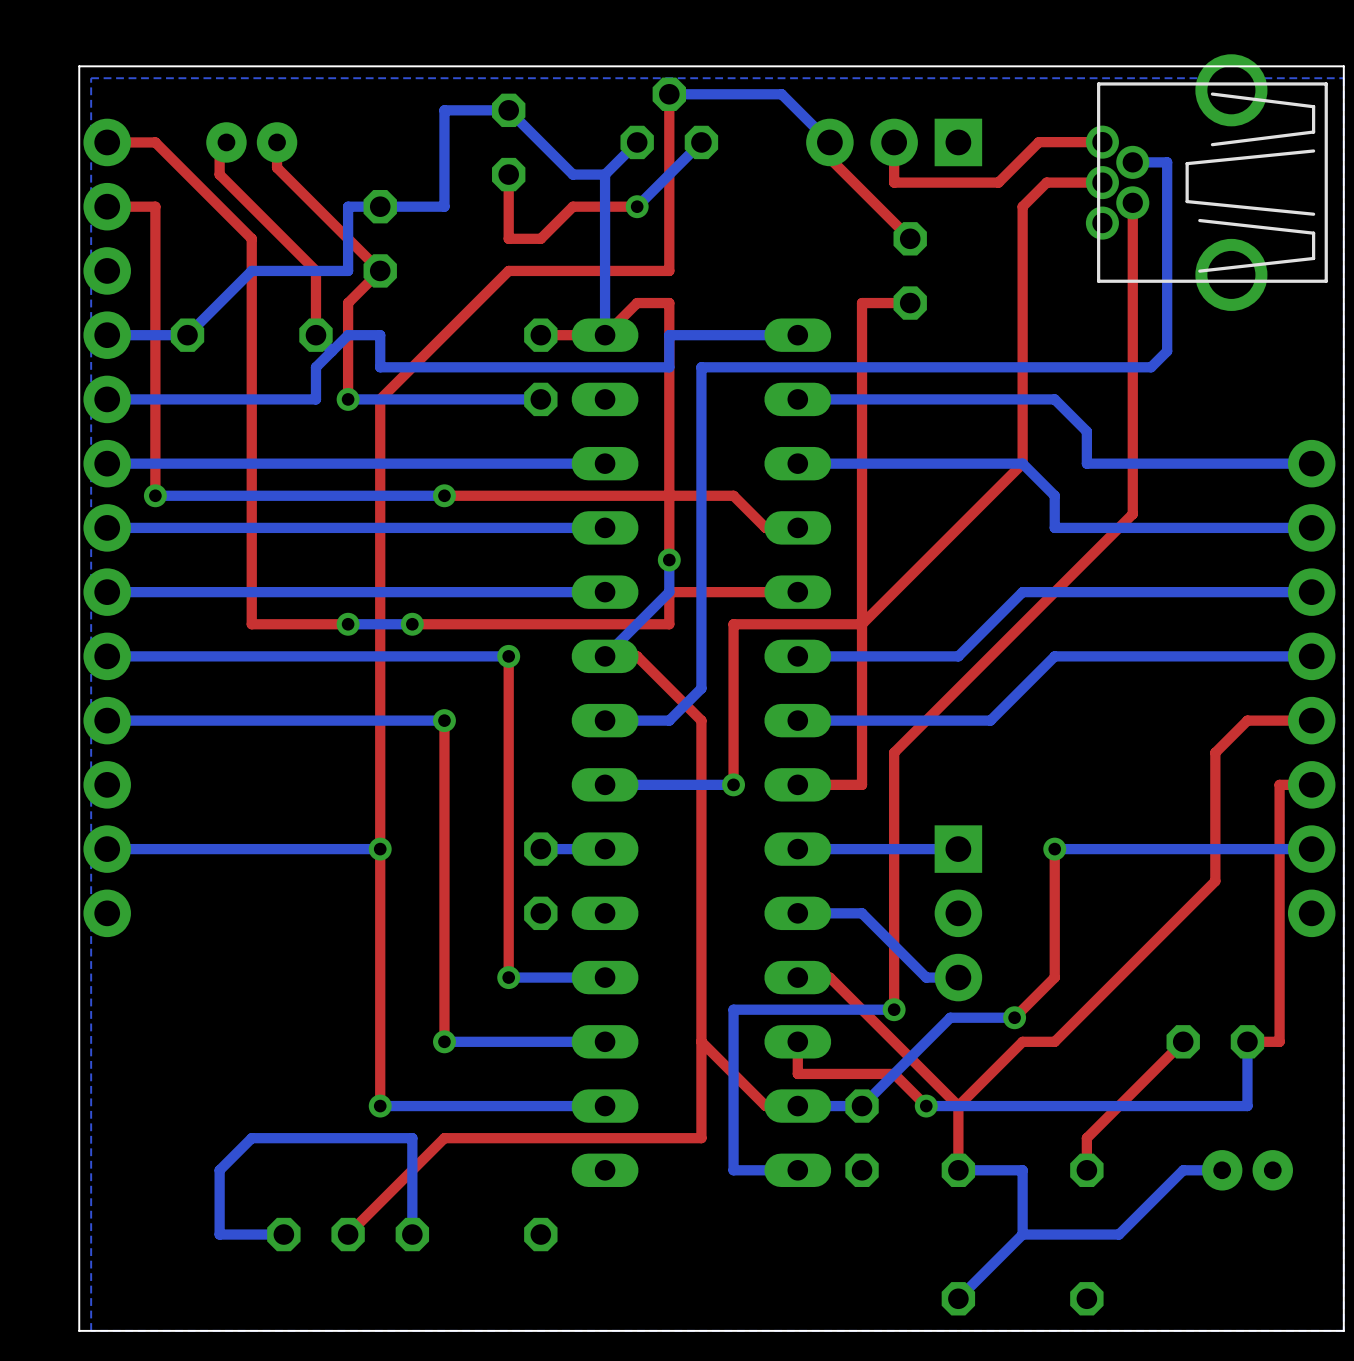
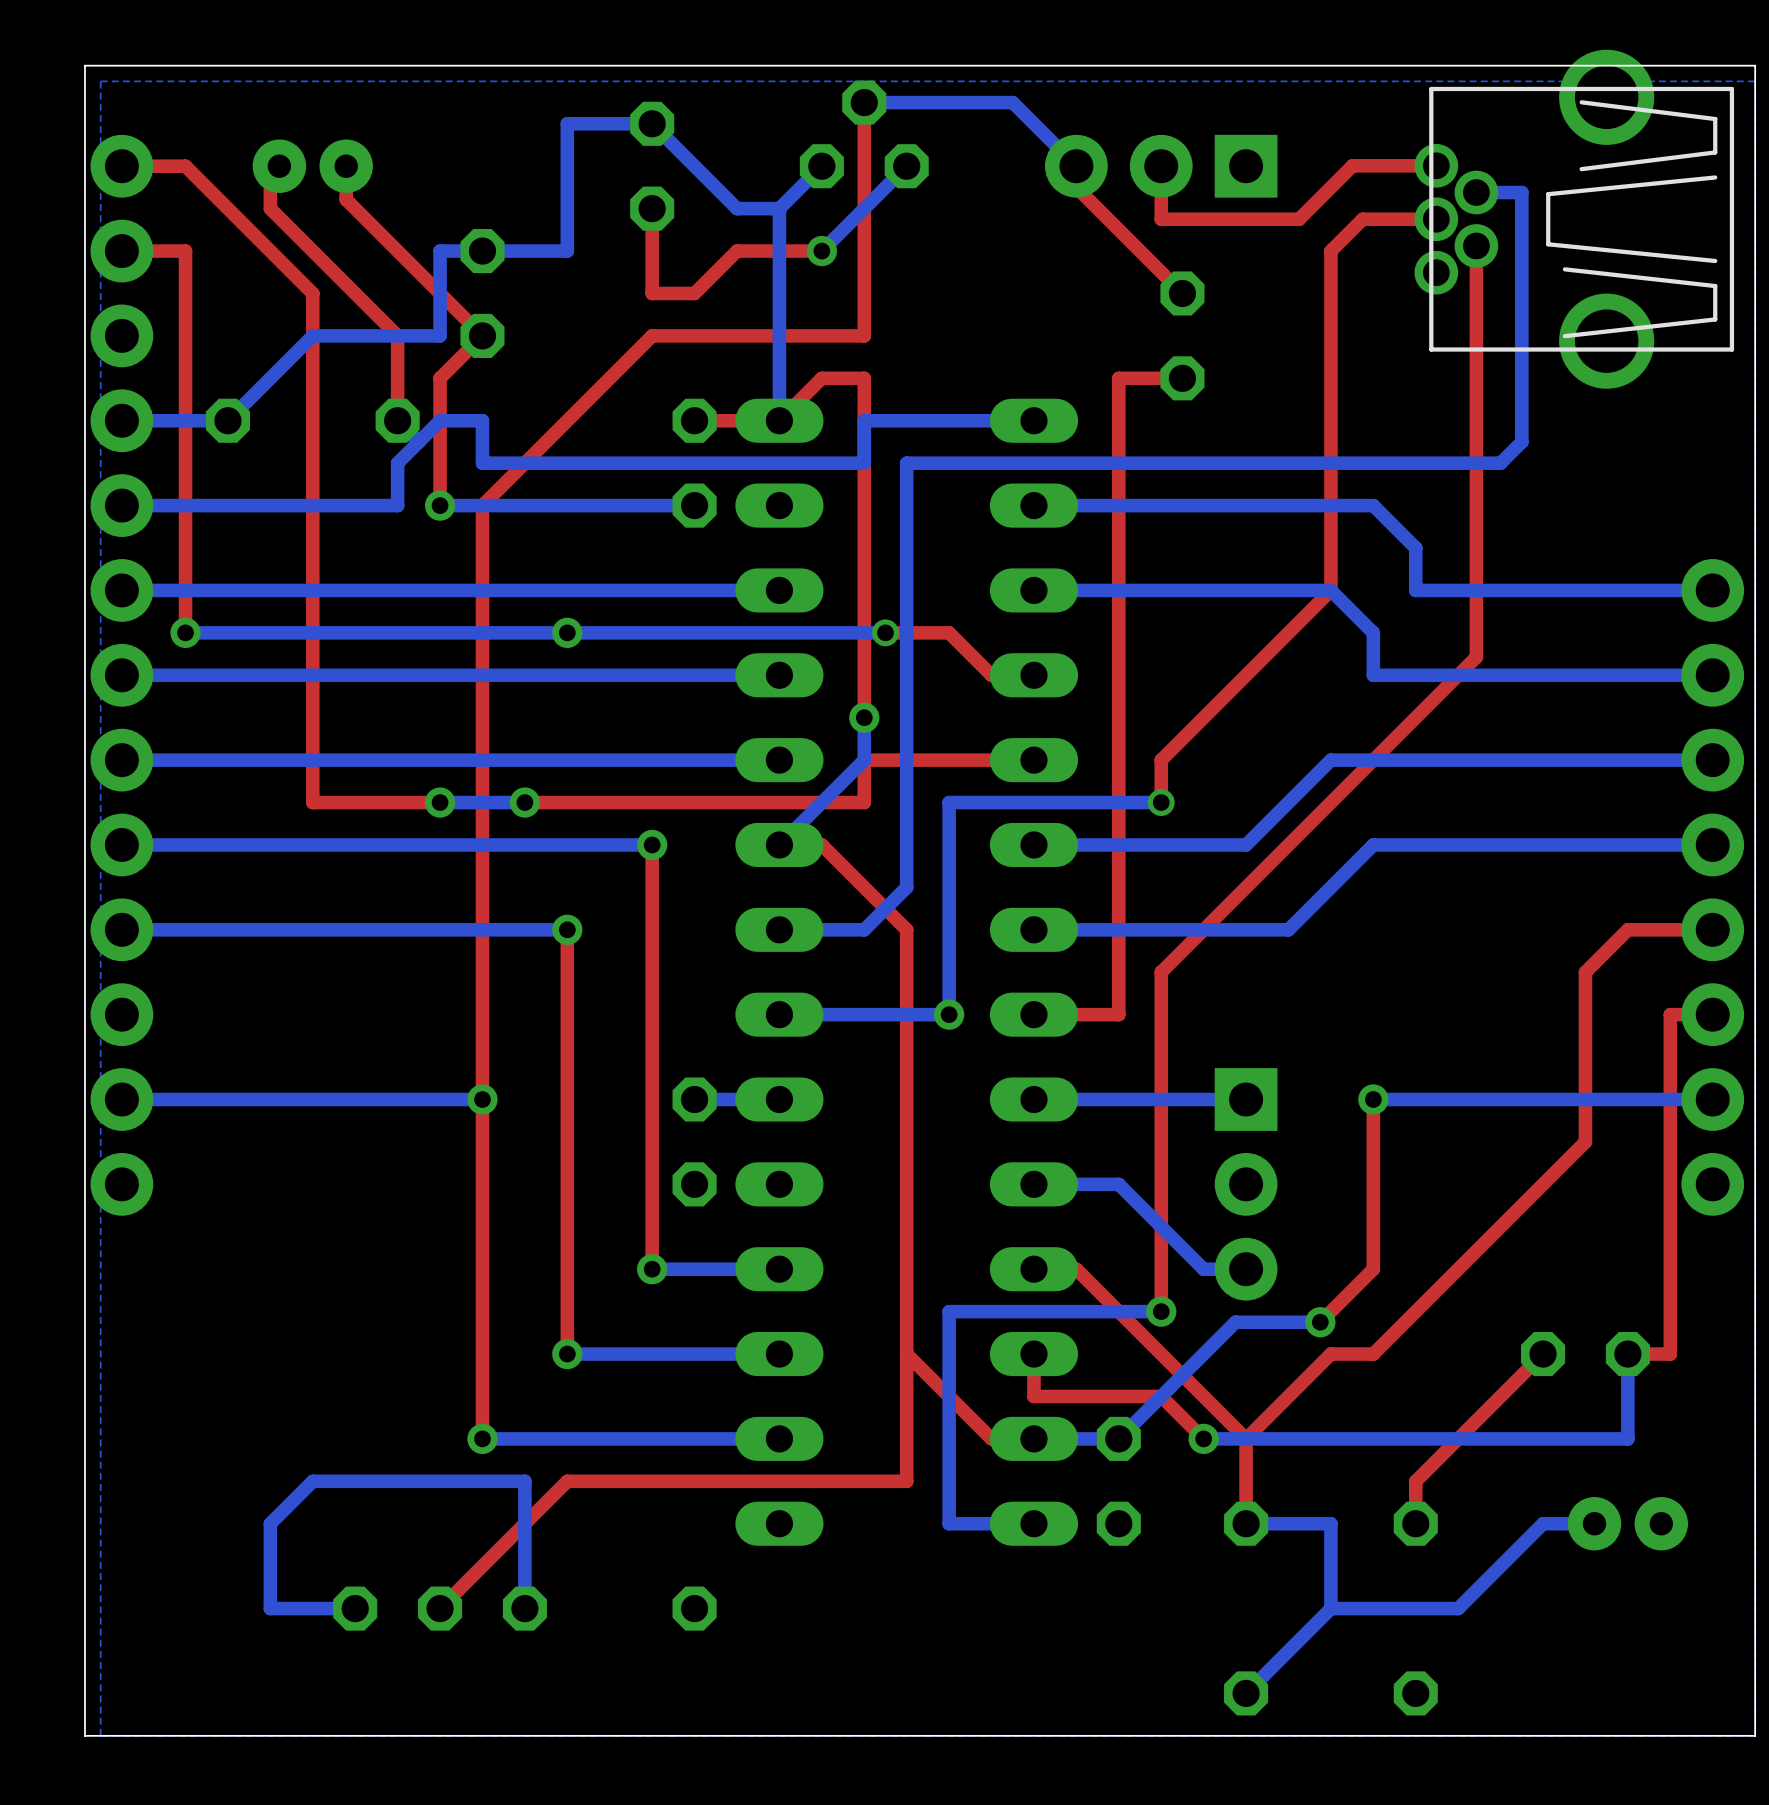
bottom track: none -> (885, 632) (567, 632)
top track: (685, 495) (444, 495) -> none
via: none -> (885, 632)
top track: (894, 592) (862, 624) (733, 624) (733, 784) -> (1161, 760) (1161, 802)
bottom track: none -> (1161, 802) (949, 802) (949, 1014)
via: none -> (1161, 802)

